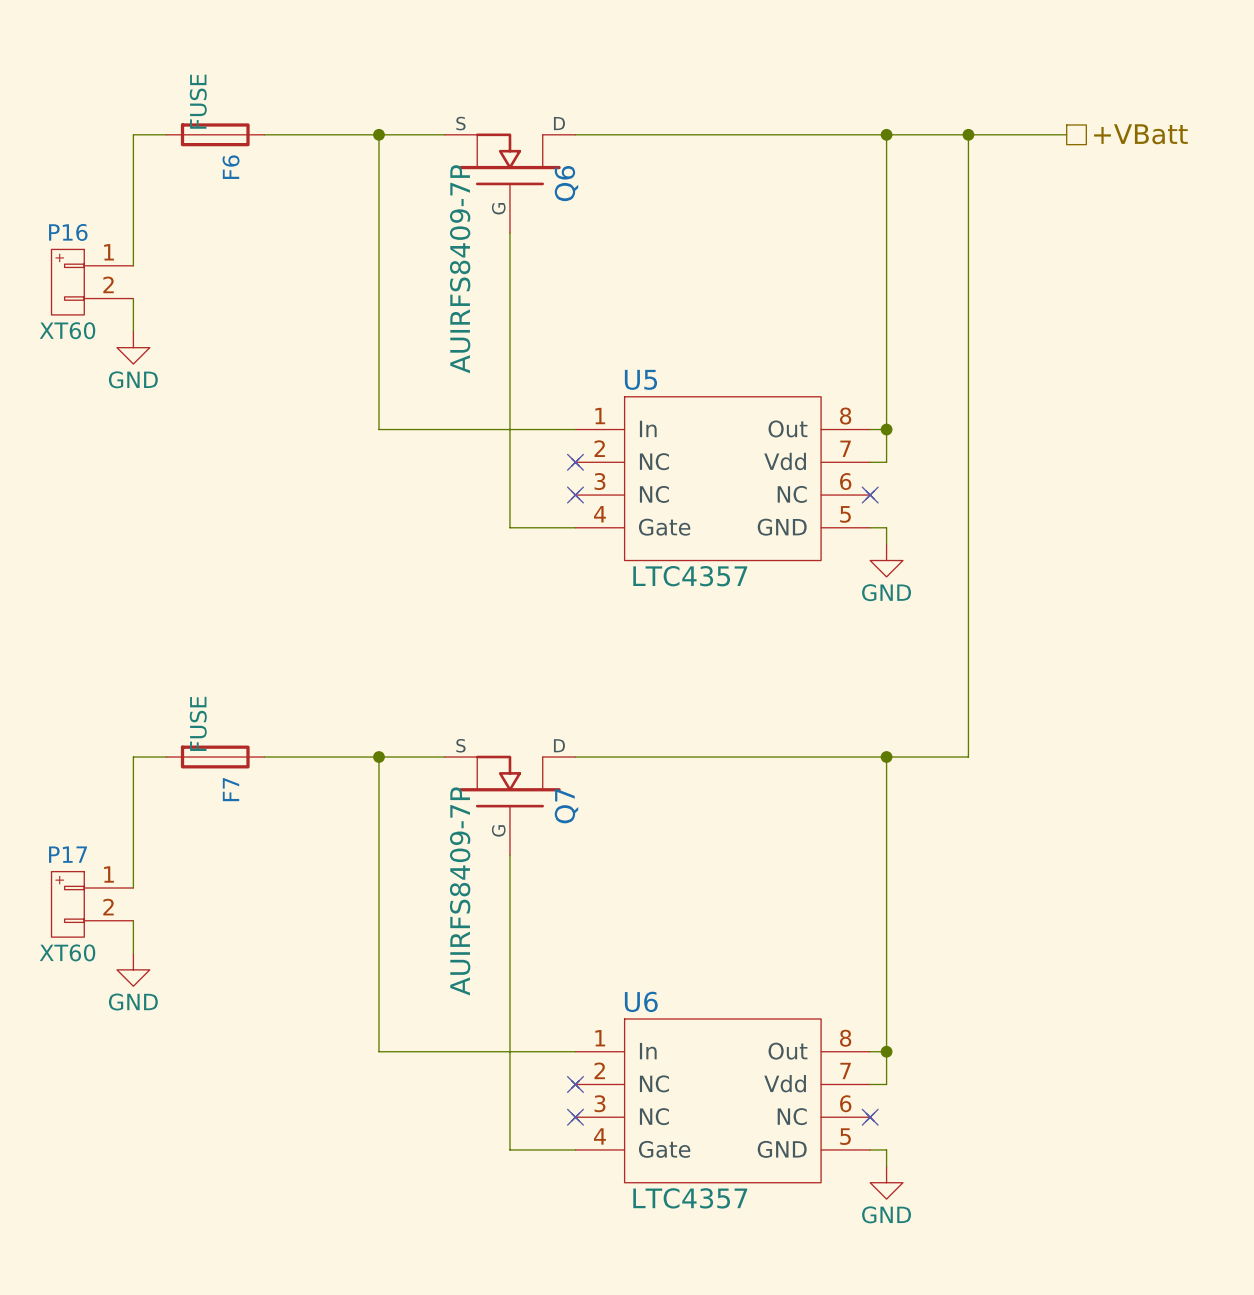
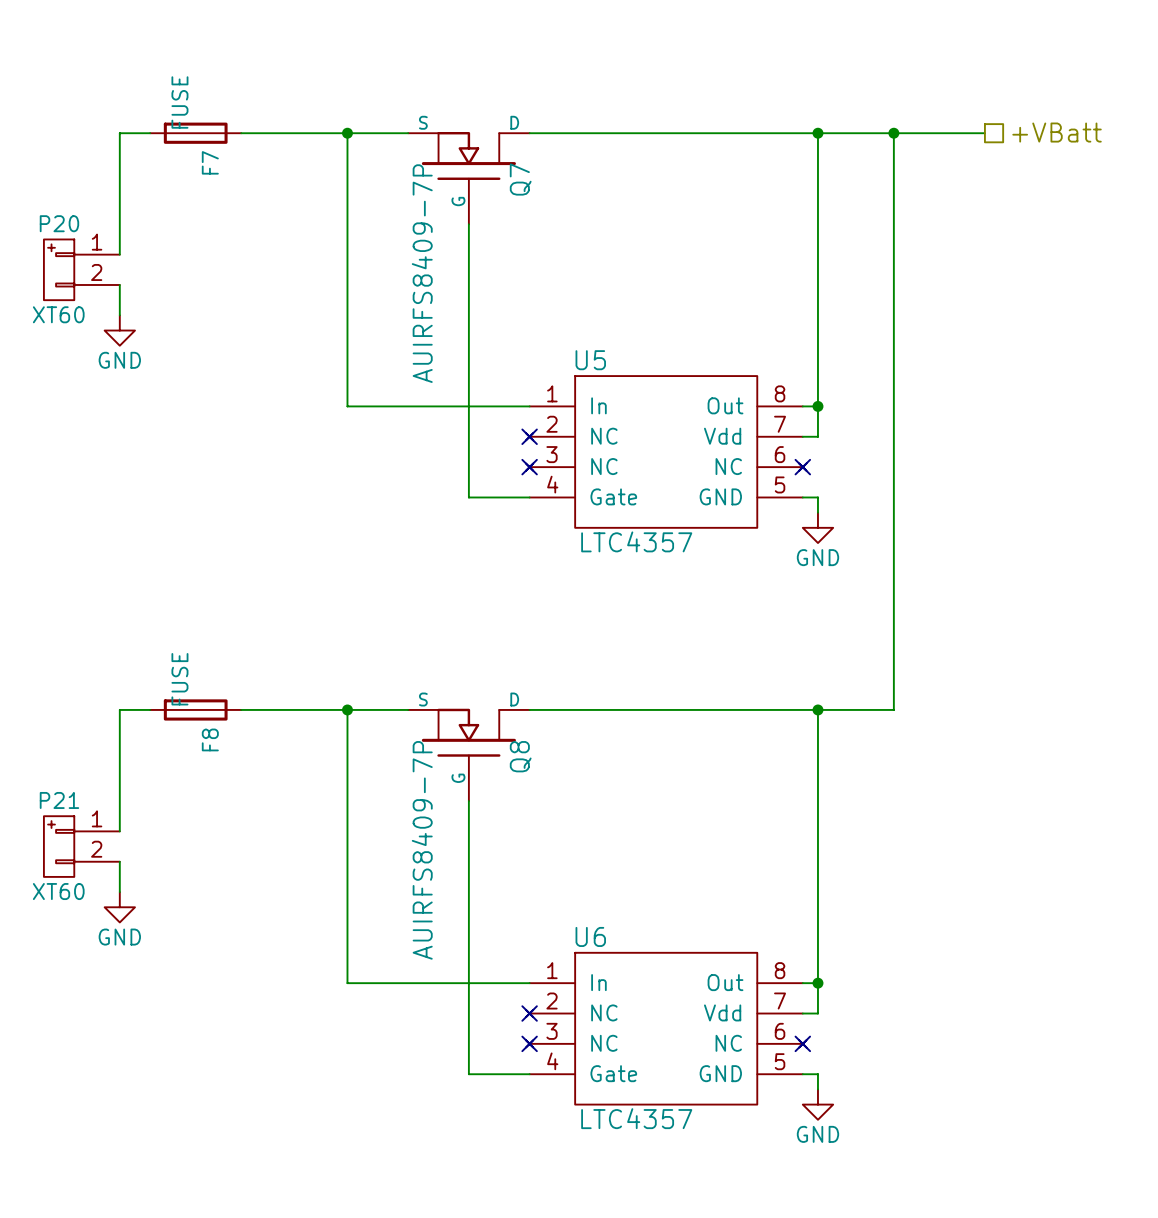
F6 name: F6 (231, 167) -> F7 (210, 162)
Q6 name: Q6 (566, 183) -> Q7 (520, 179)
P16 name: P16 (68, 232) -> P20 (59, 223)
F7 name: F7 (231, 789) -> F8 (210, 739)
Q7 name: Q7 (566, 806) -> Q8 (520, 756)
P17 name: P17 (68, 854) -> P21 (59, 800)

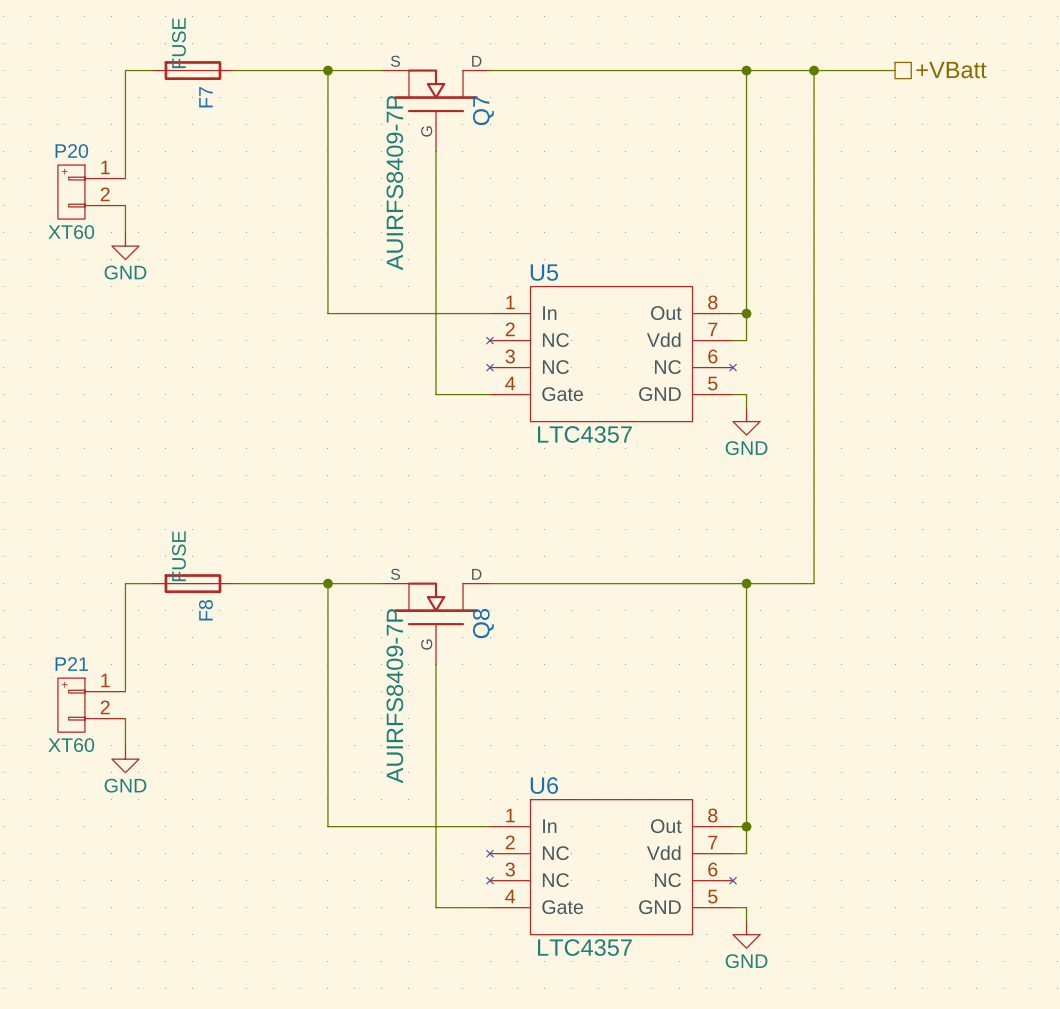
no-connect mark: (529, 436) -> none
no-connect mark: (529, 467) -> none
no-connect mark: (802, 467) -> none
no-connect mark: (529, 1013) -> none
no-connect mark: (529, 1043) -> none
no-connect mark: (802, 1043) -> none

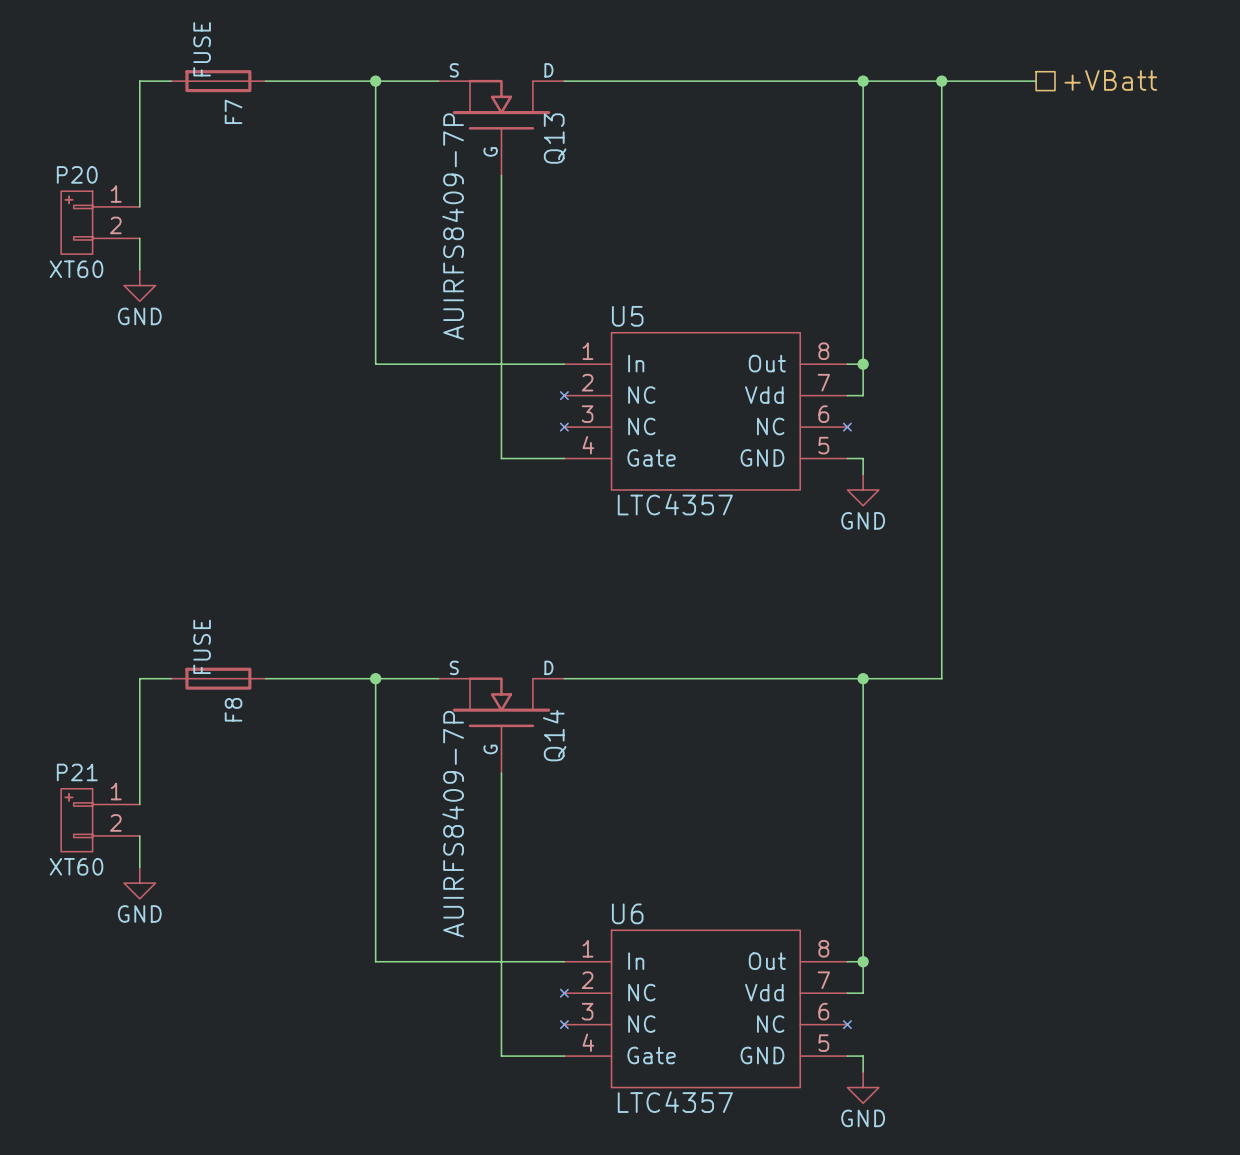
Q7 name: Q7 (483, 110) -> Q13 (555, 138)
Q8 name: Q8 (483, 623) -> Q14 (554, 735)

